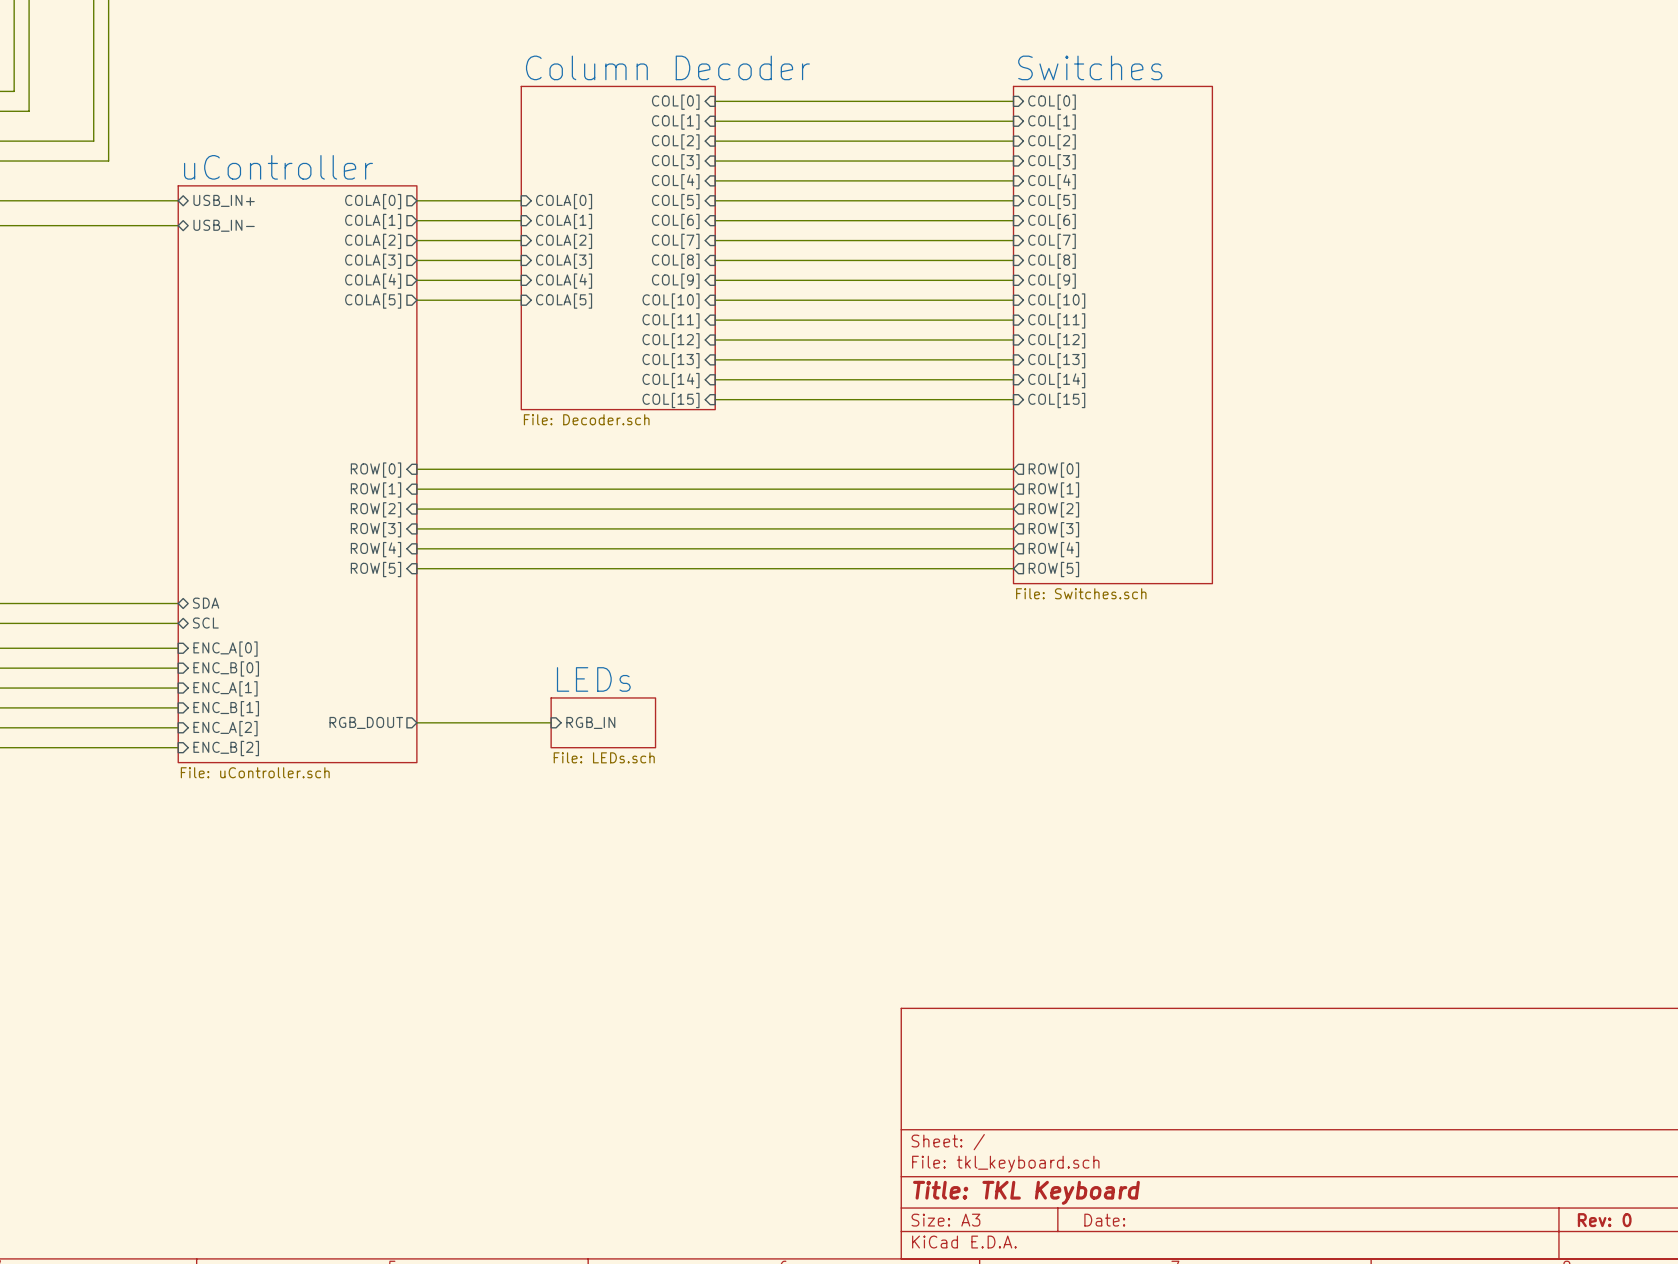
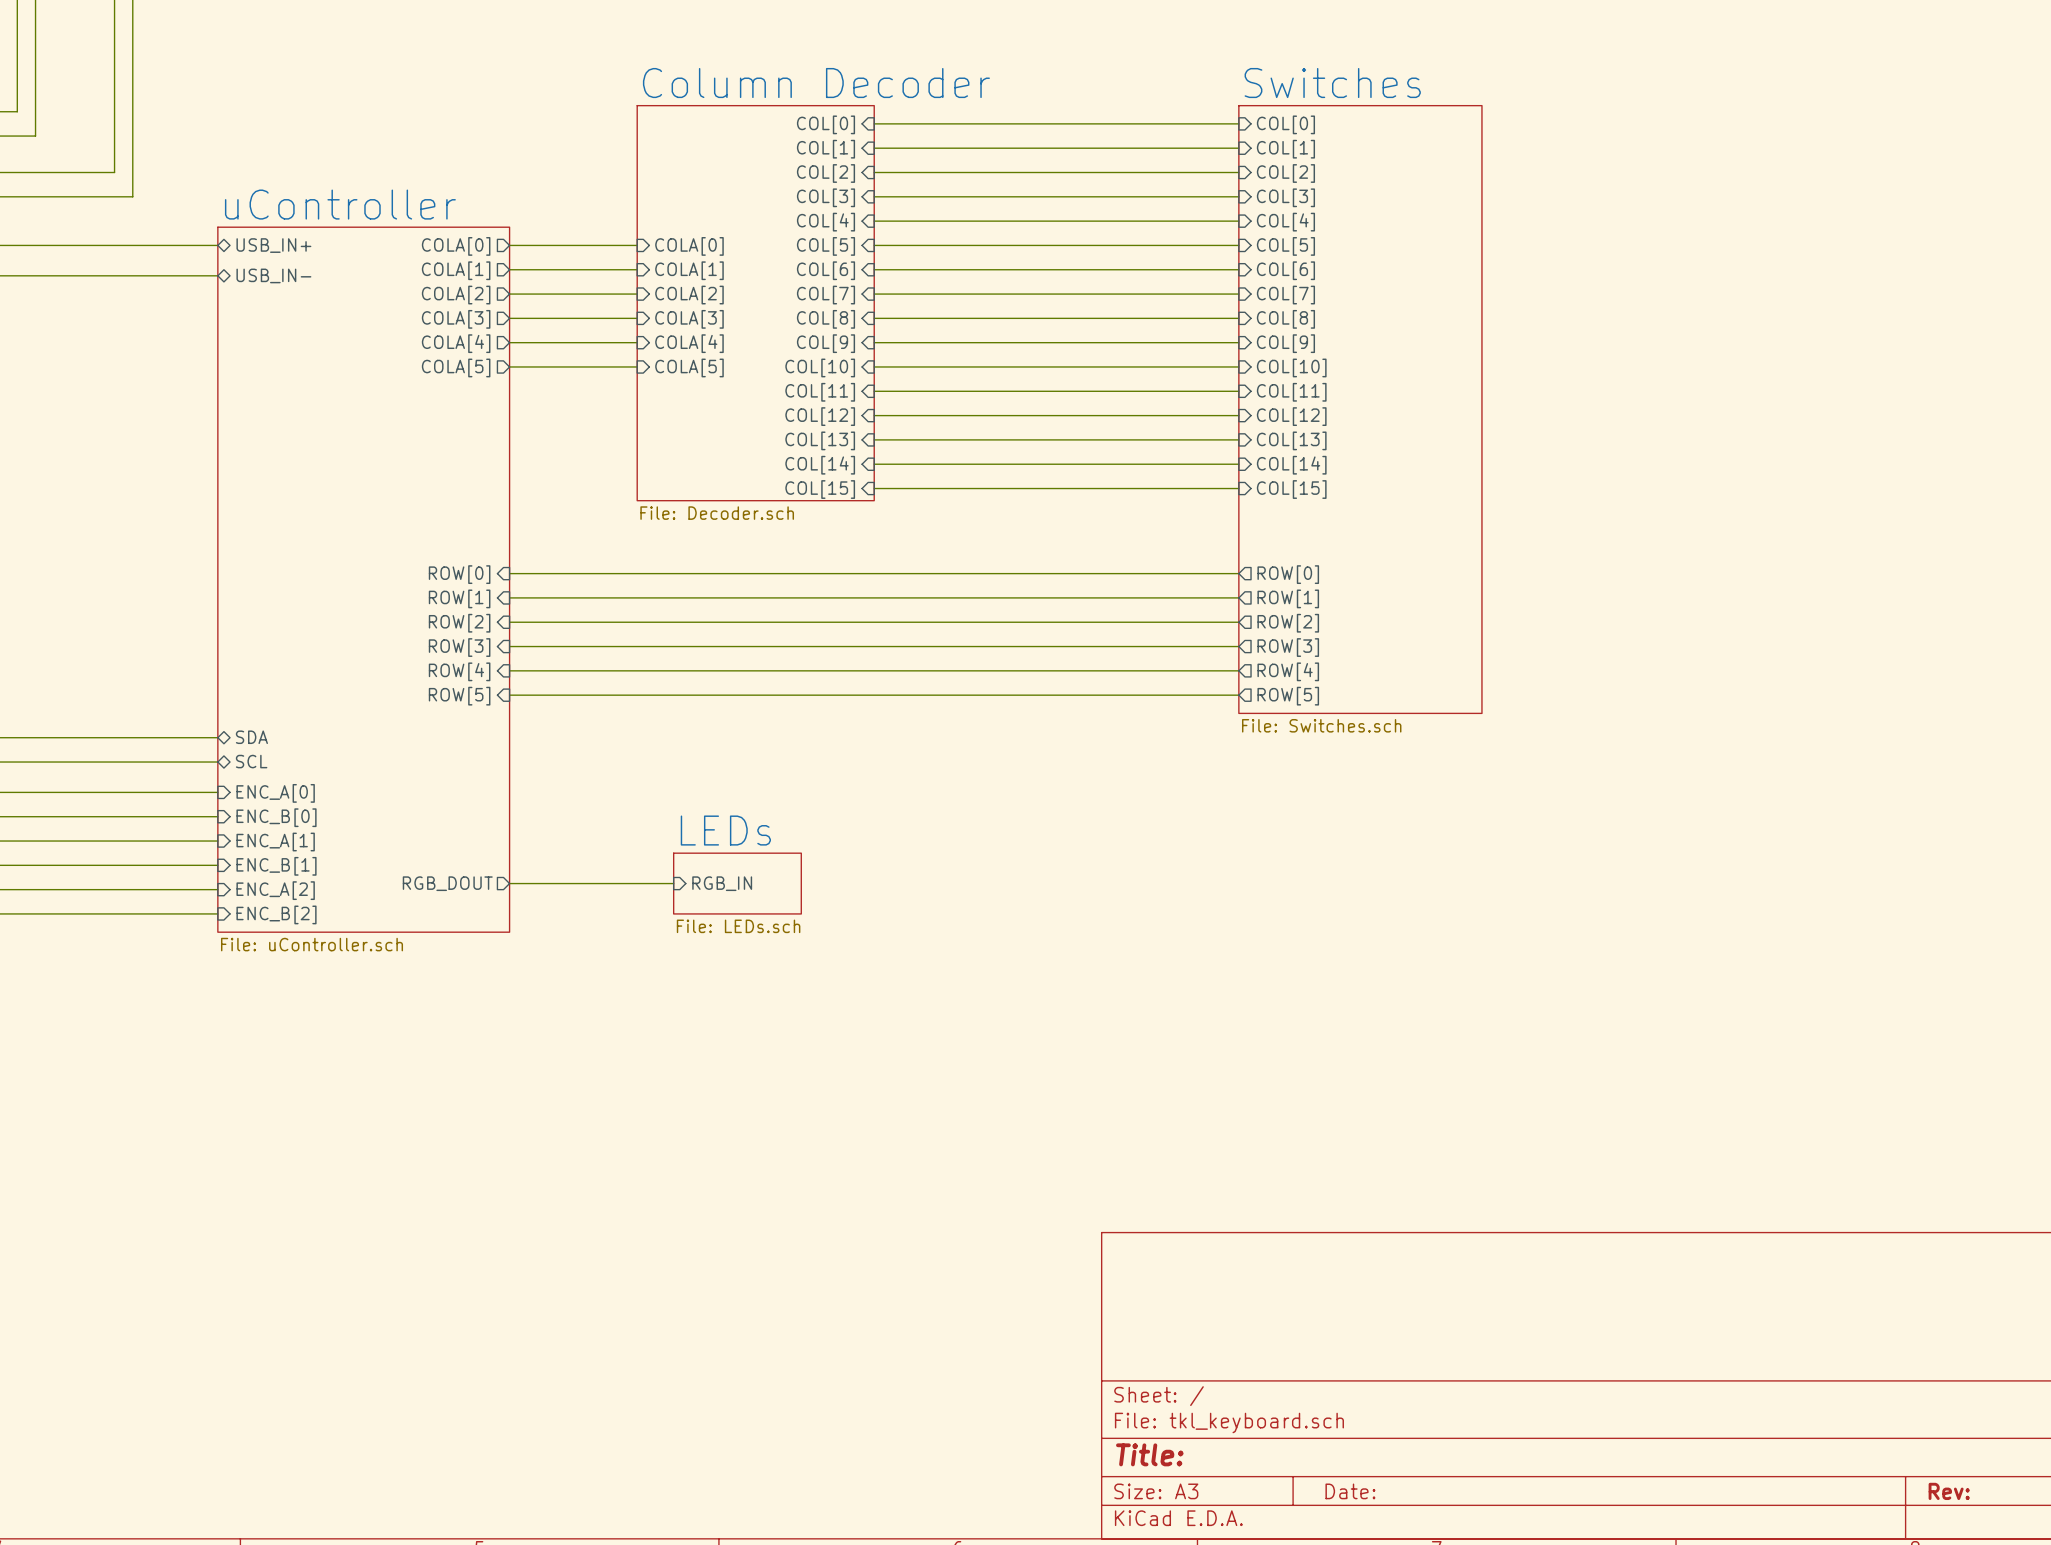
title block: Title: TKL Keyboard (1026, 1192) -> Title: (1149, 1454)
title block: Rev: 0 (1604, 1220) -> Rev: (1949, 1491)

